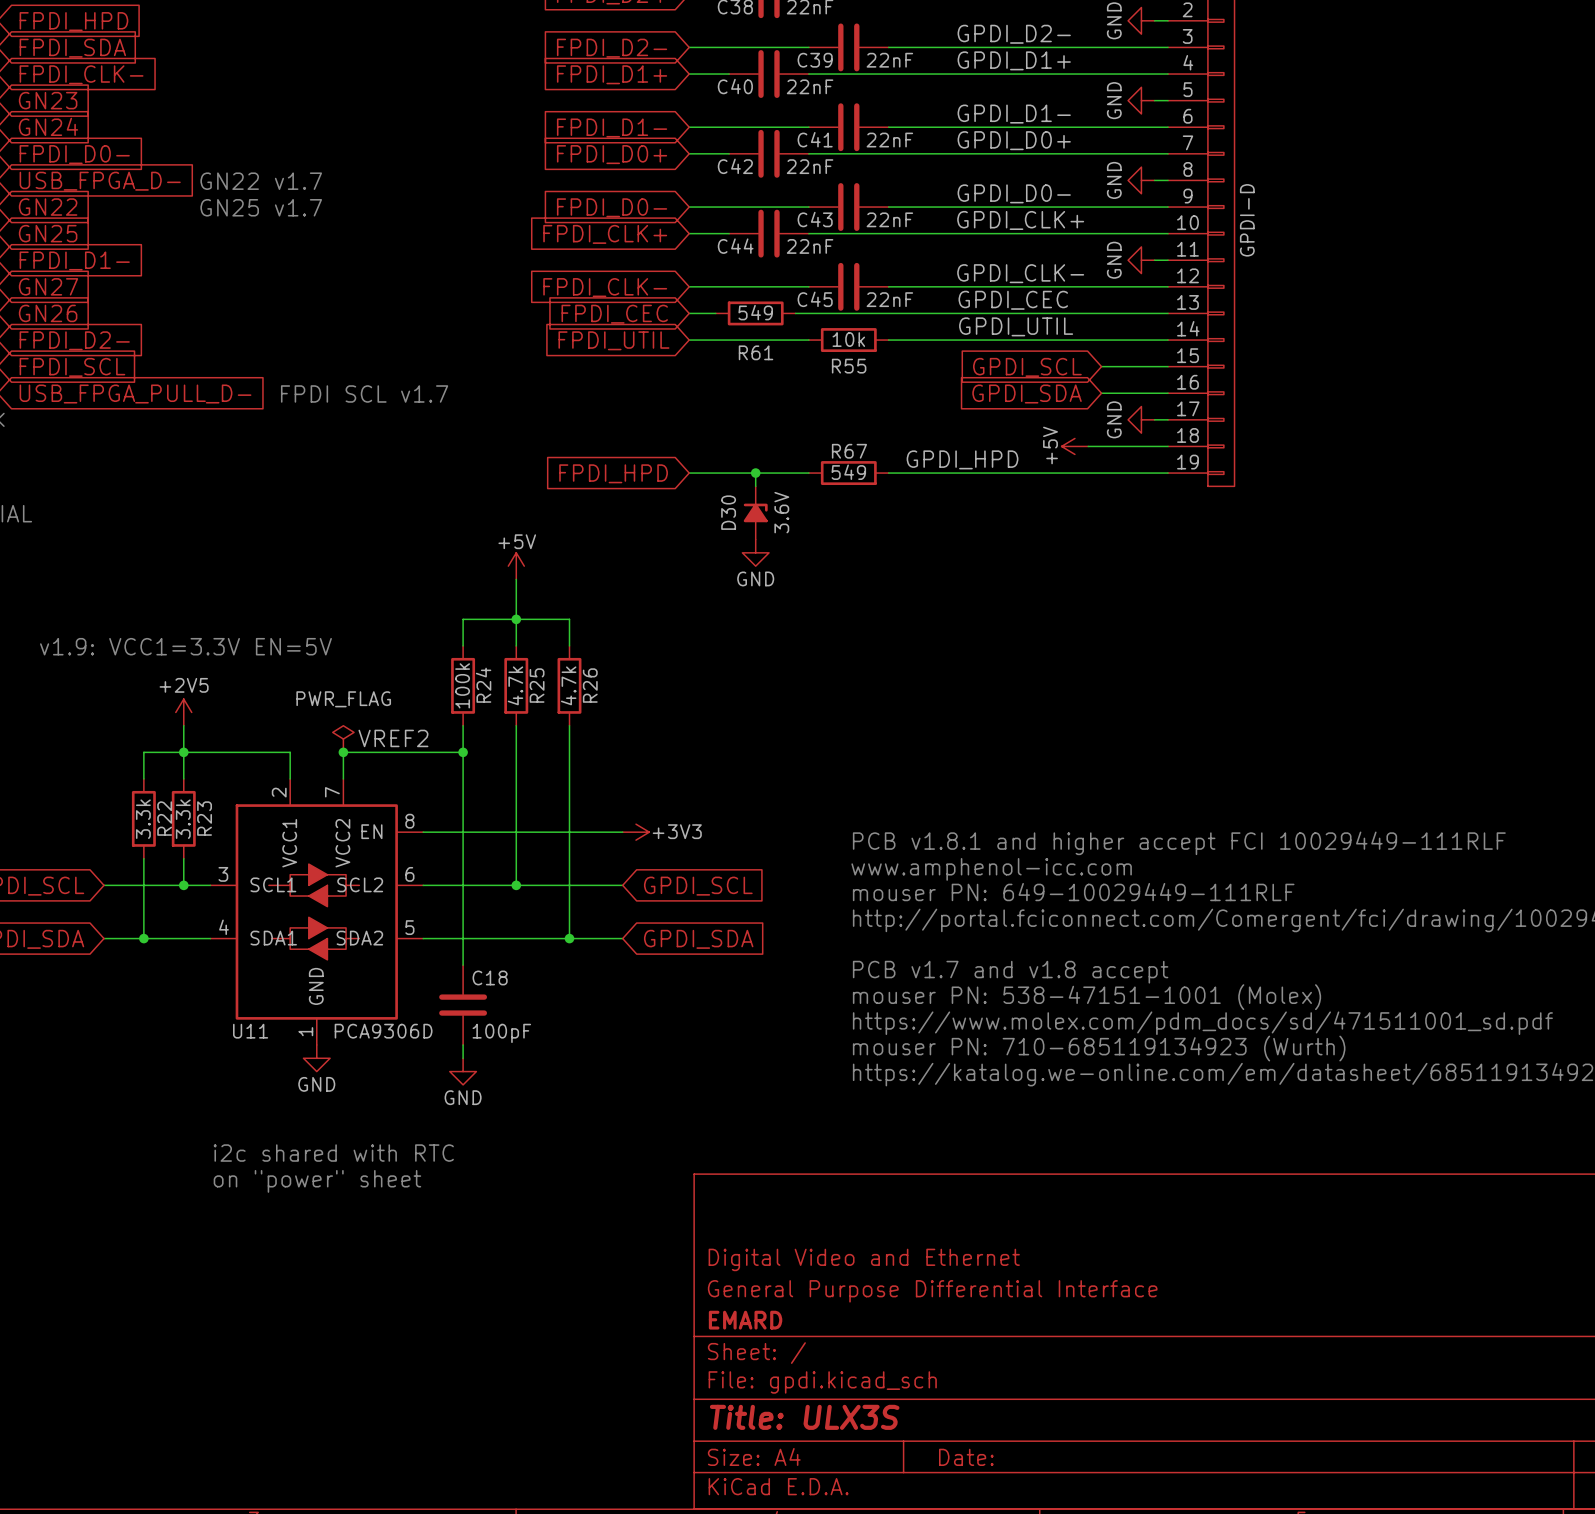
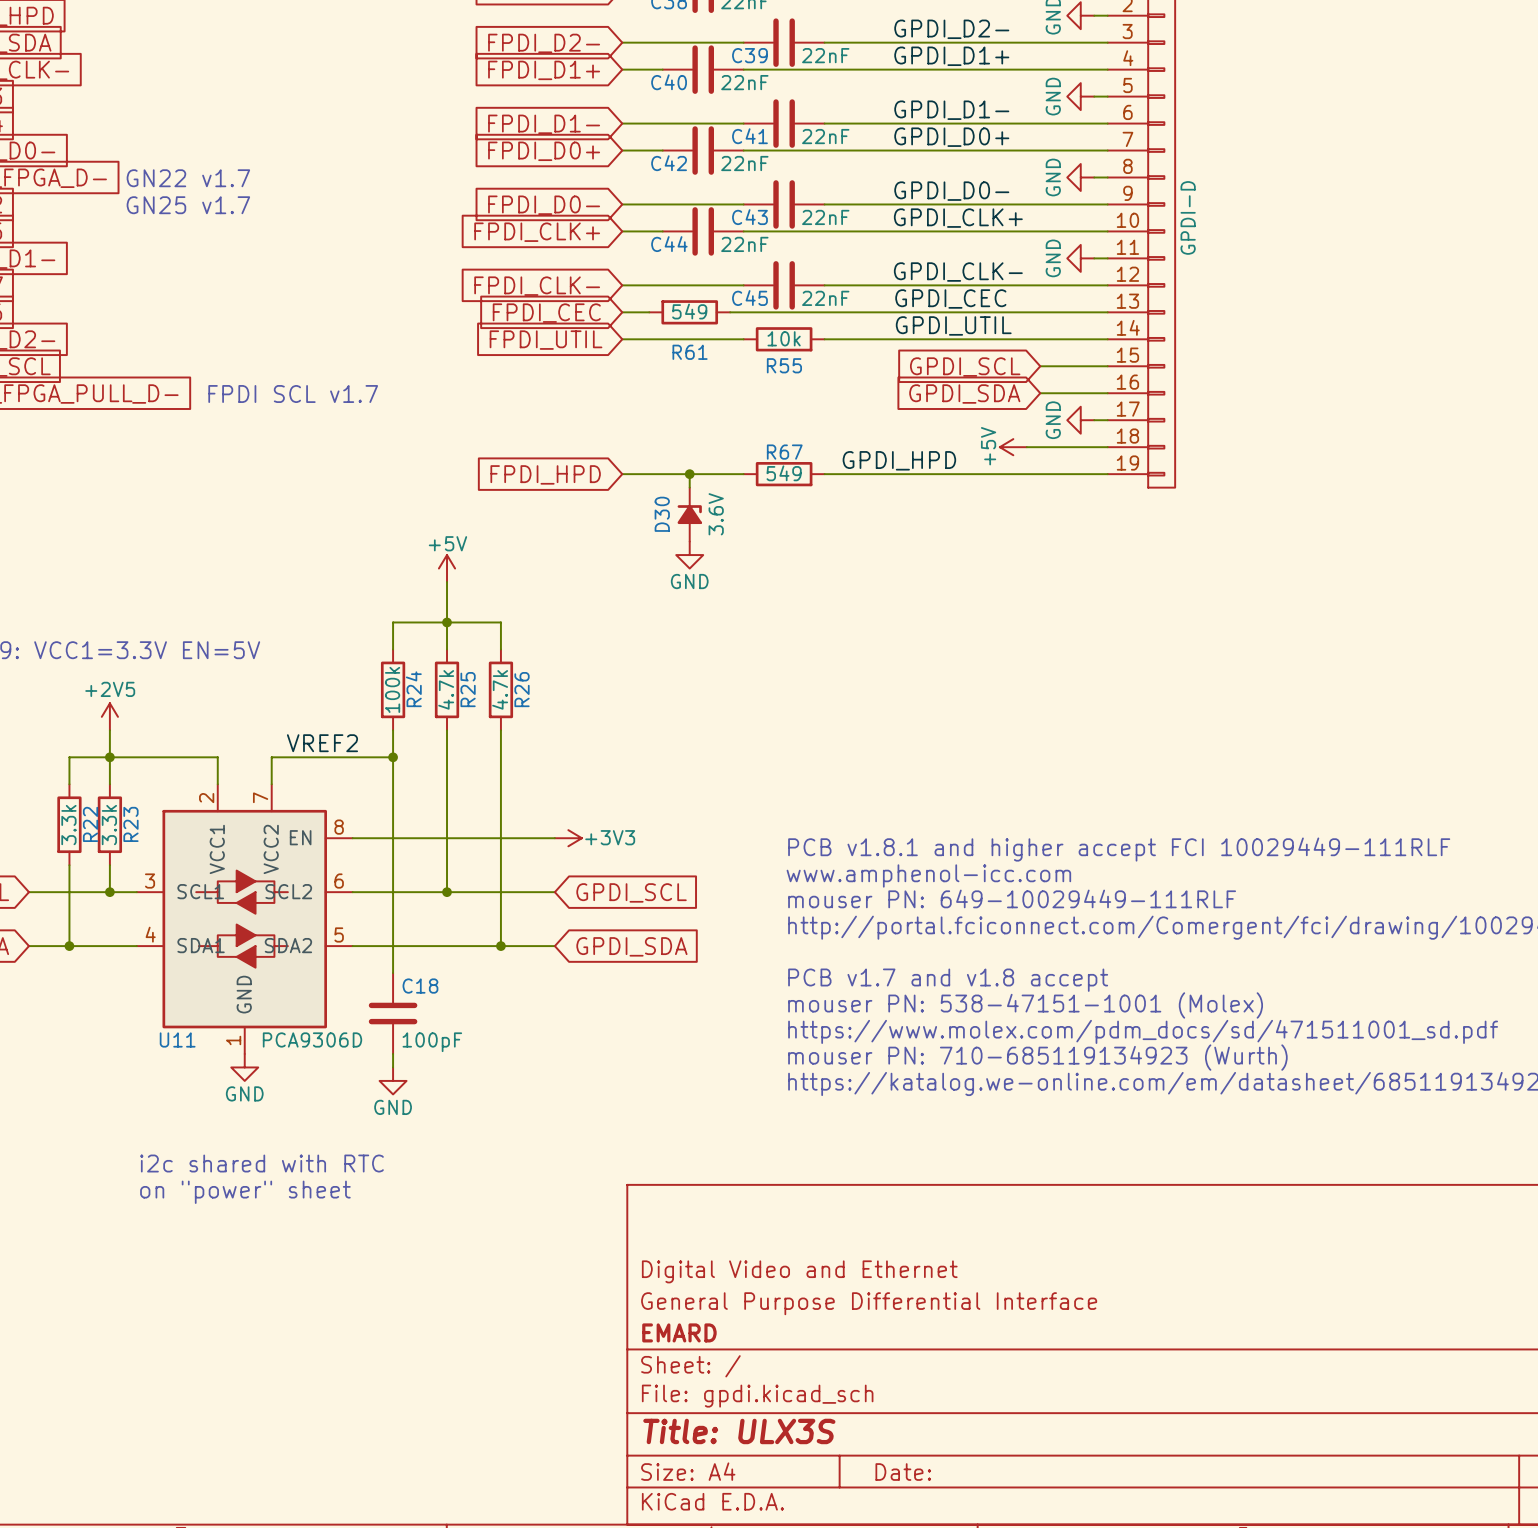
power symbol: PWR_FLAG (343, 739) -> none
junction: (343, 752) -> none

